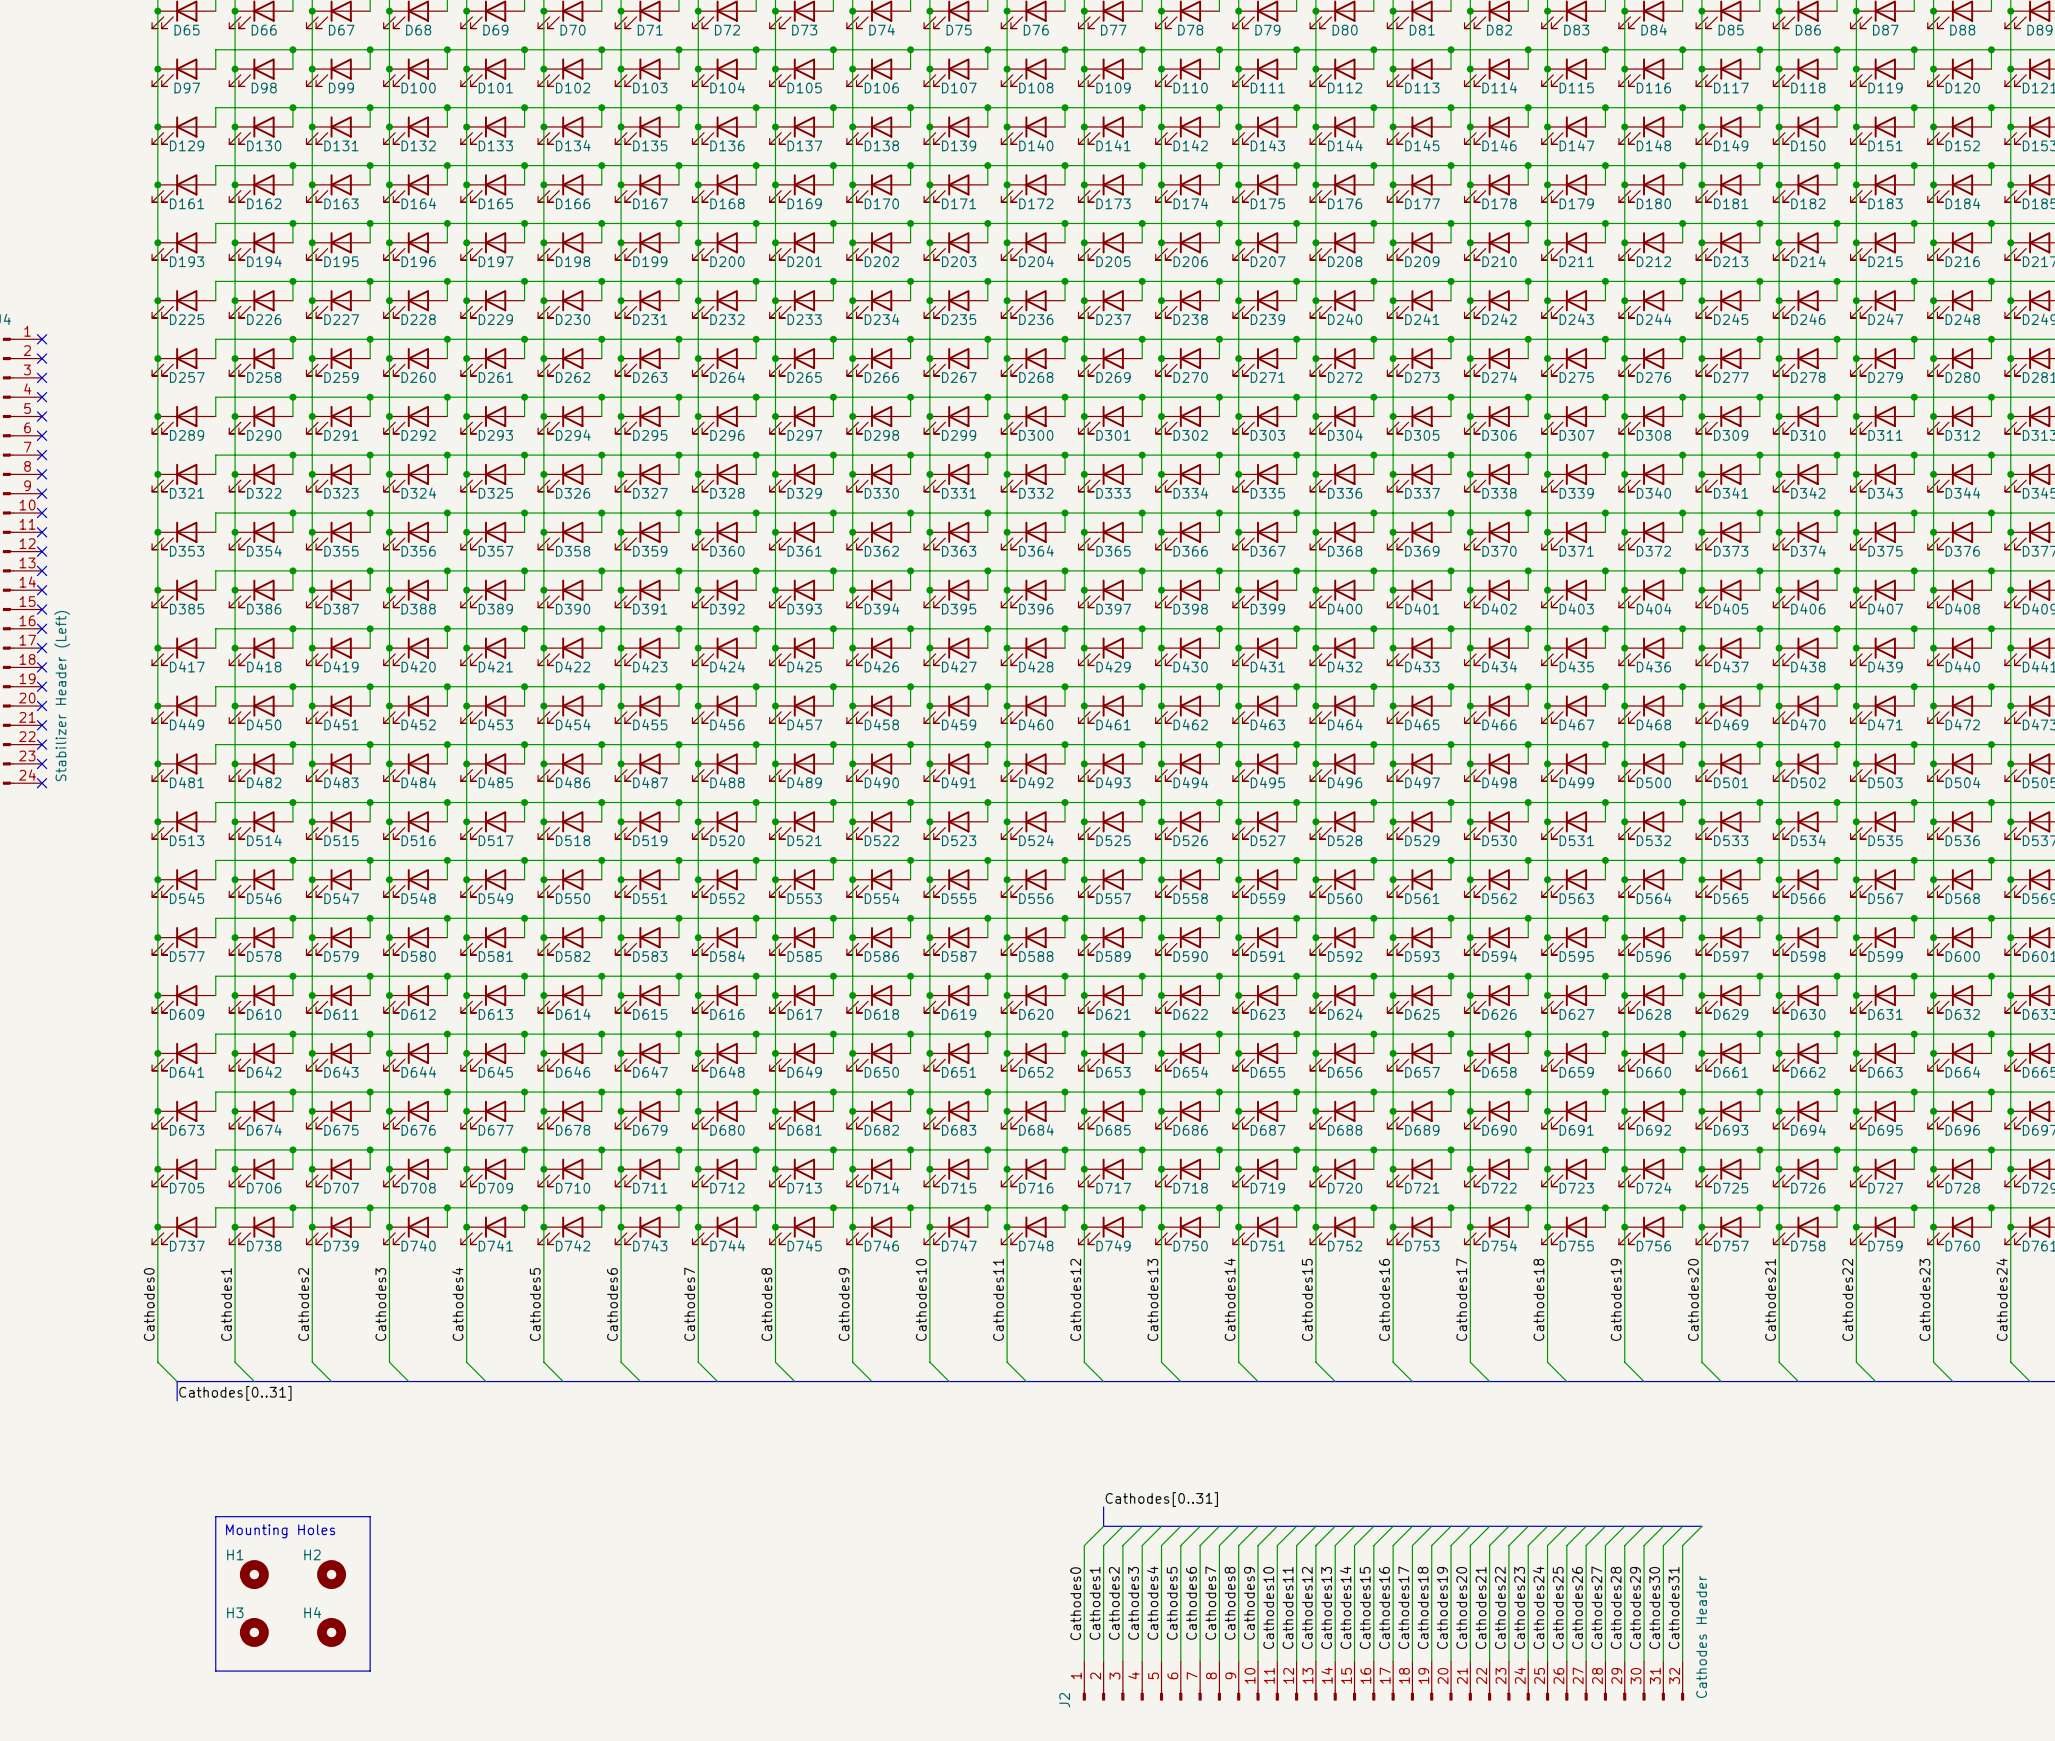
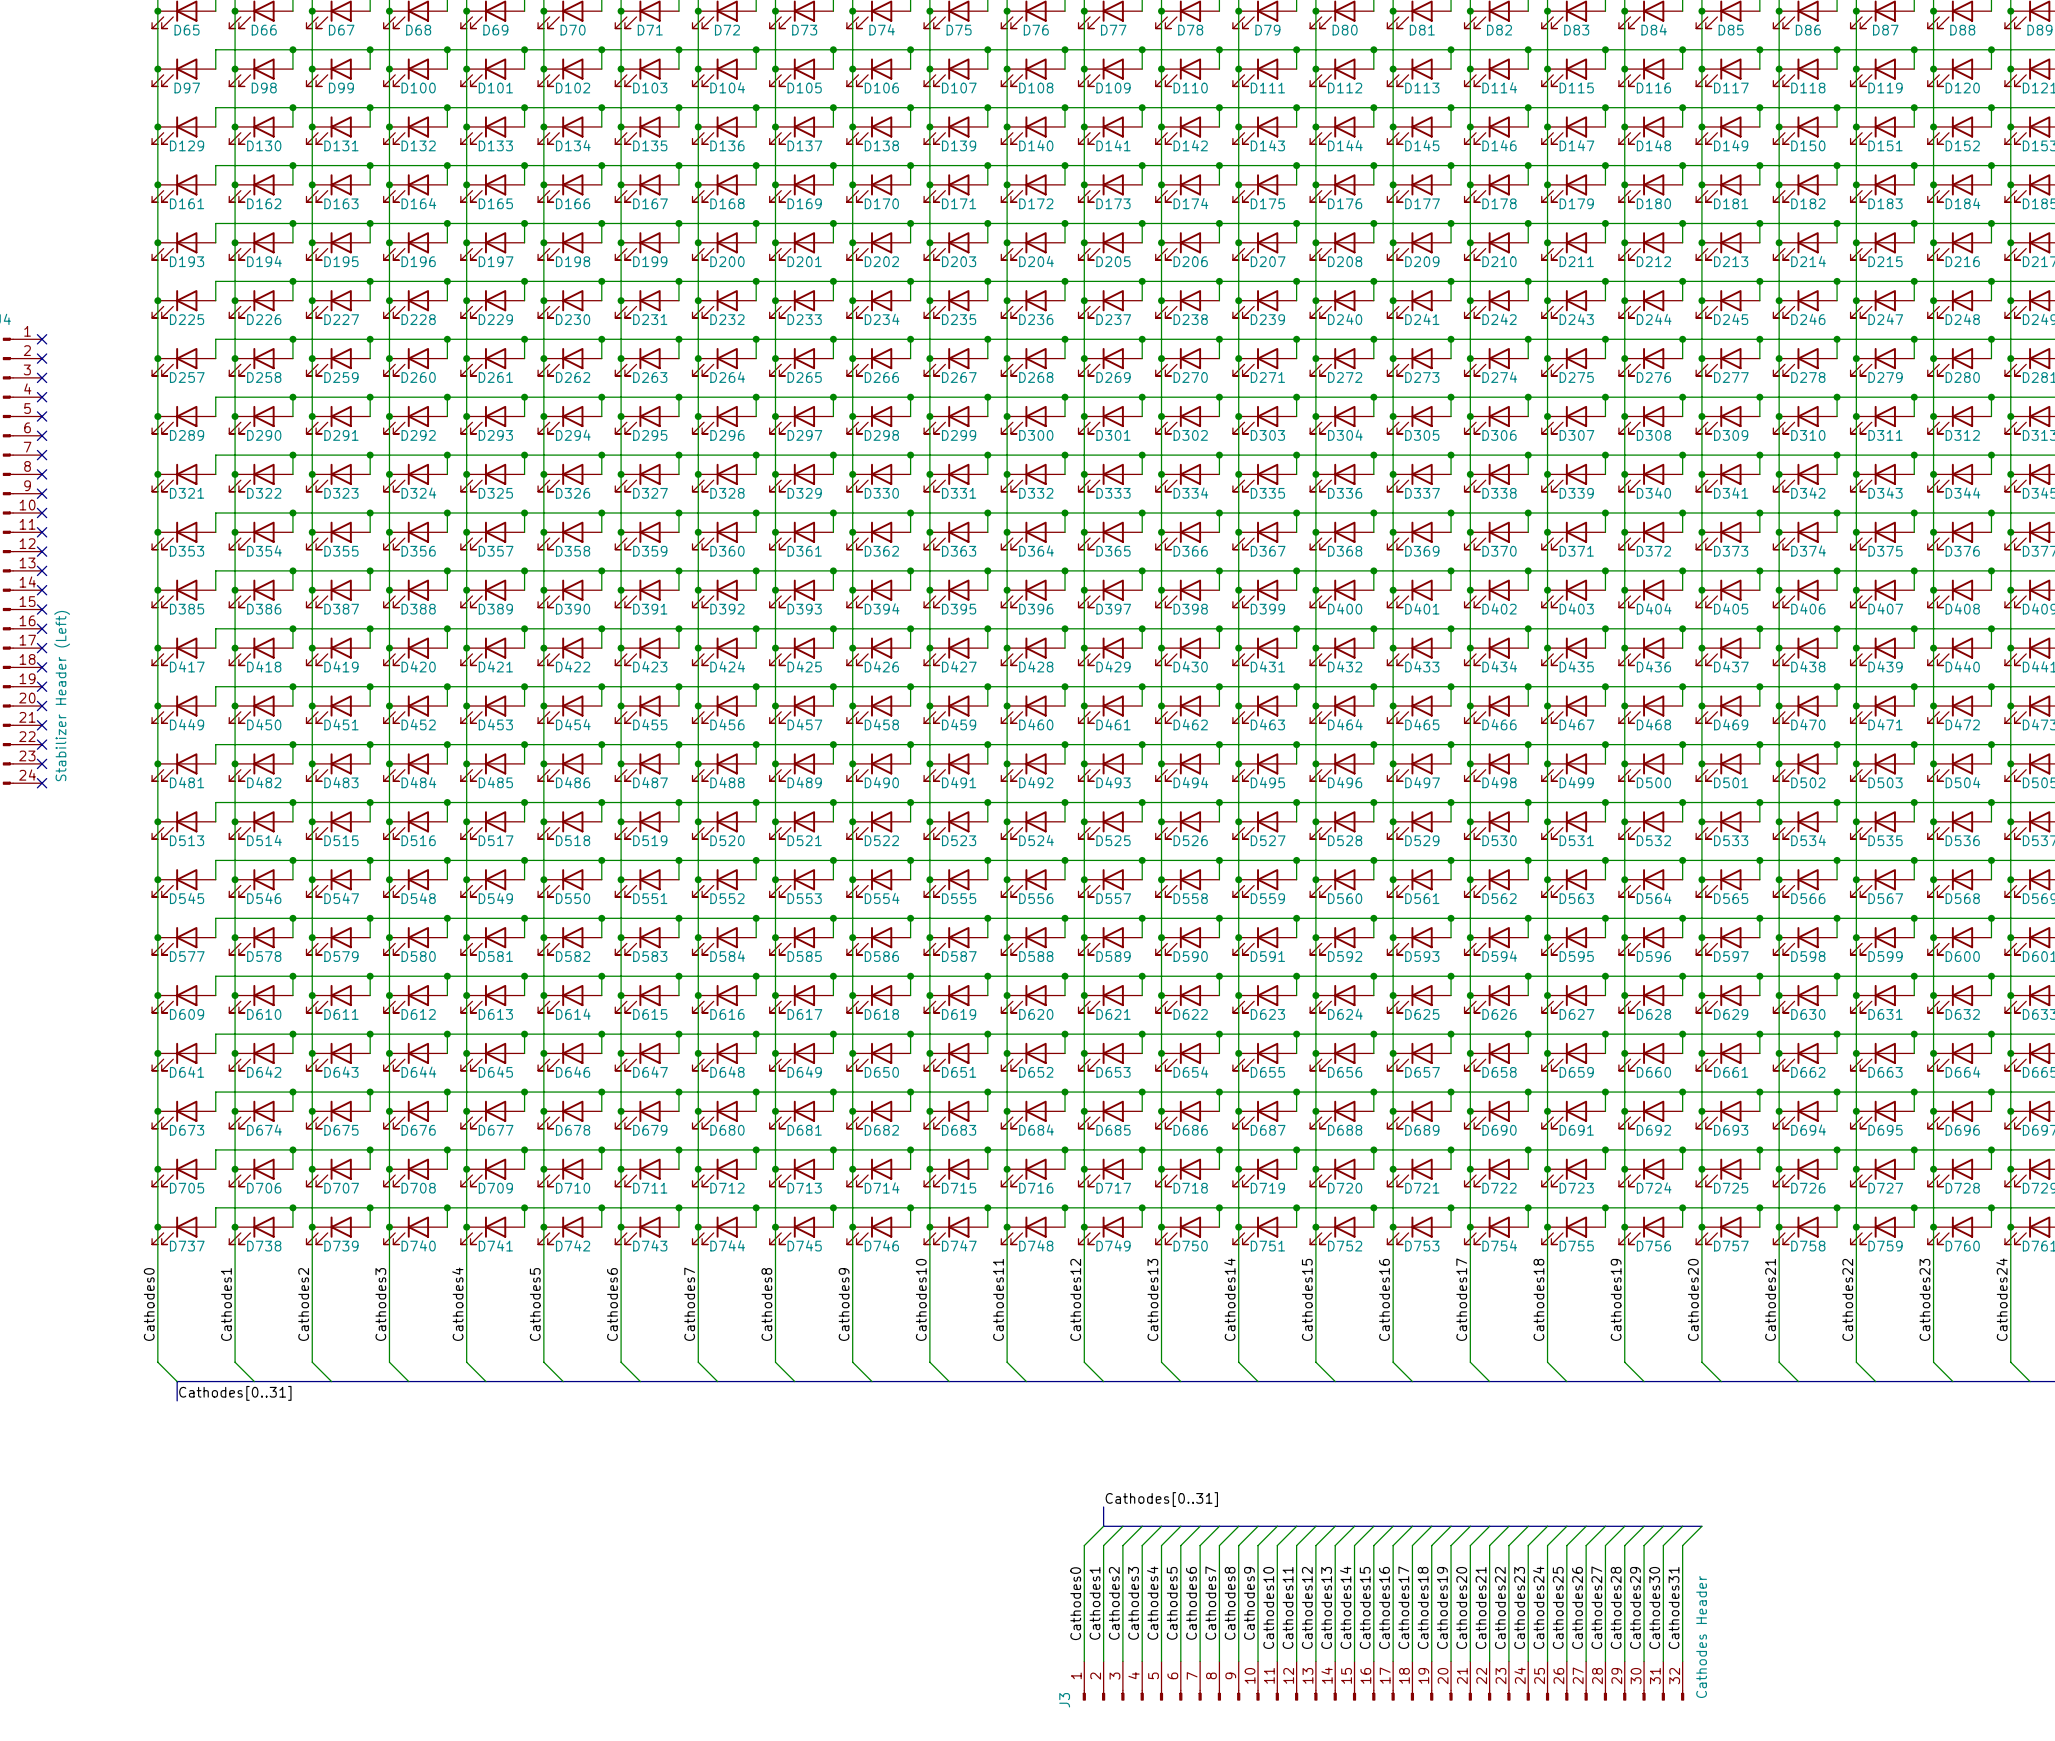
line: (215, 1516) (370, 1516) (370, 1671) (215, 1671) (215, 1516) -> none
text: Mounting Holes (280, 1531) -> none
H1: (254, 1574) -> none
H2: (331, 1574) -> none
H3: (254, 1632) -> none
H4: (331, 1632) -> none
J2 name: J2 (1064, 1700) -> J3 (1064, 1700)

